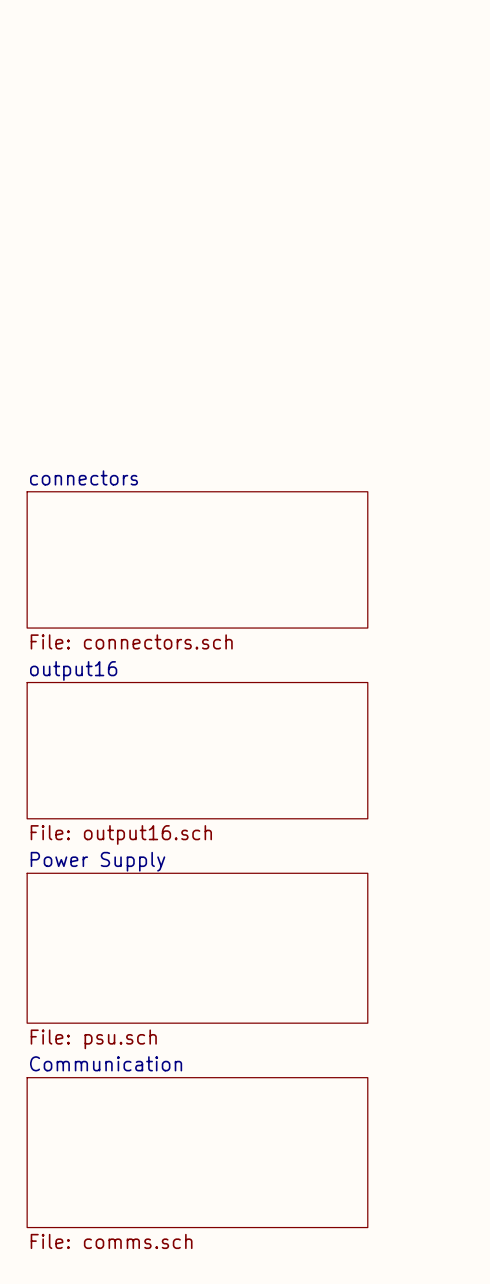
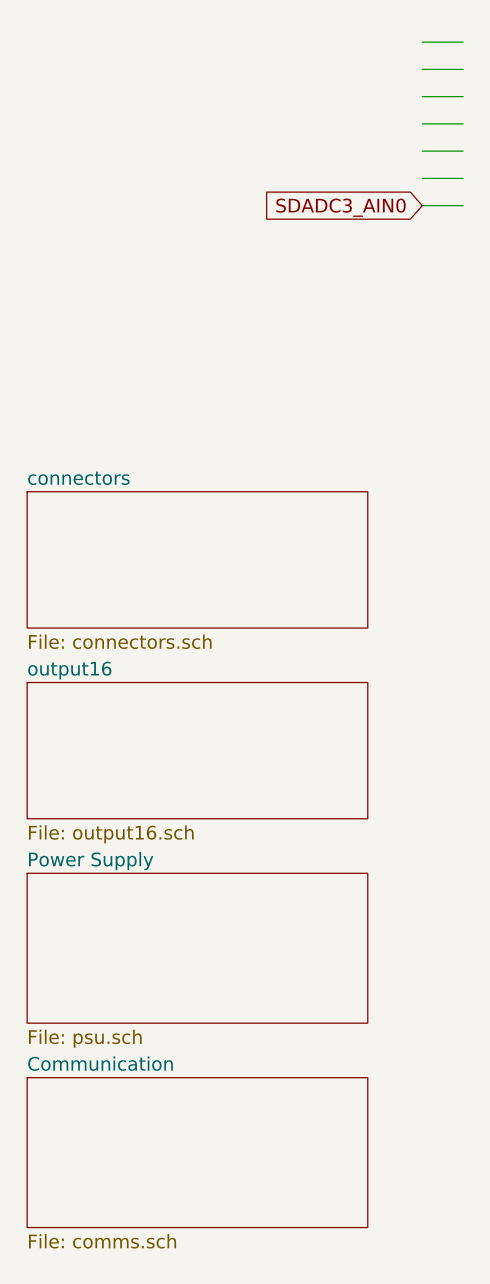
wire: none -> (422, 42) (463, 42)
wire: none -> (422, 69) (463, 69)
wire: none -> (422, 96) (463, 96)
wire: none -> (422, 123) (463, 123)
wire: none -> (422, 151) (463, 151)
wire: none -> (422, 178) (463, 178)
wire: none -> (422, 205) (463, 205)
global label: none -> SDADC3_AIN0 (341, 207)

